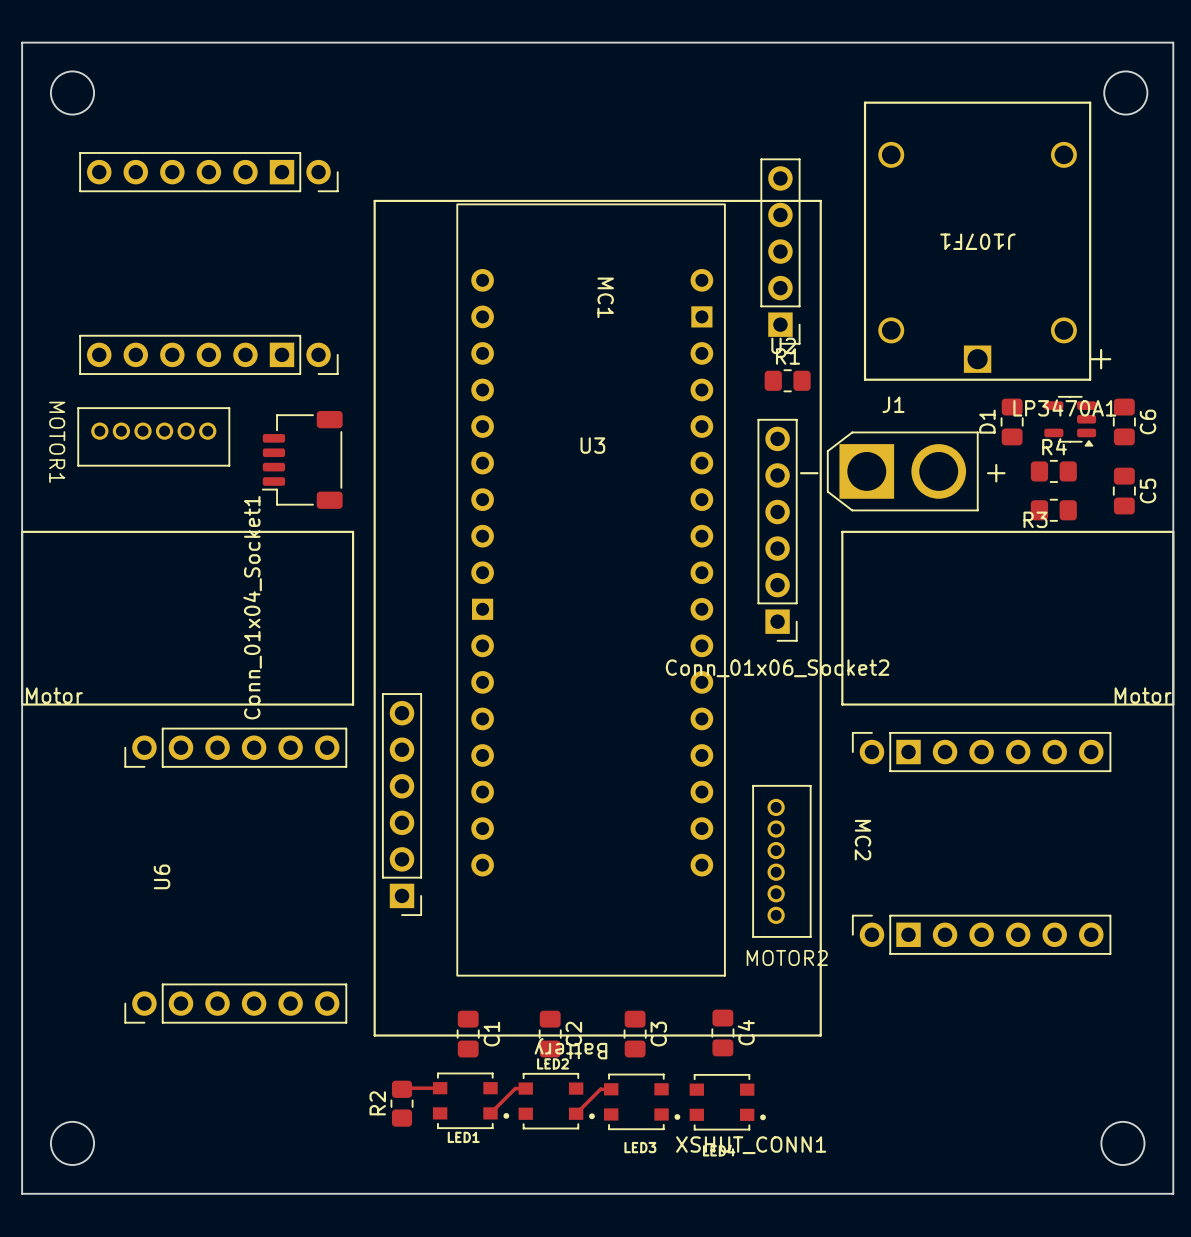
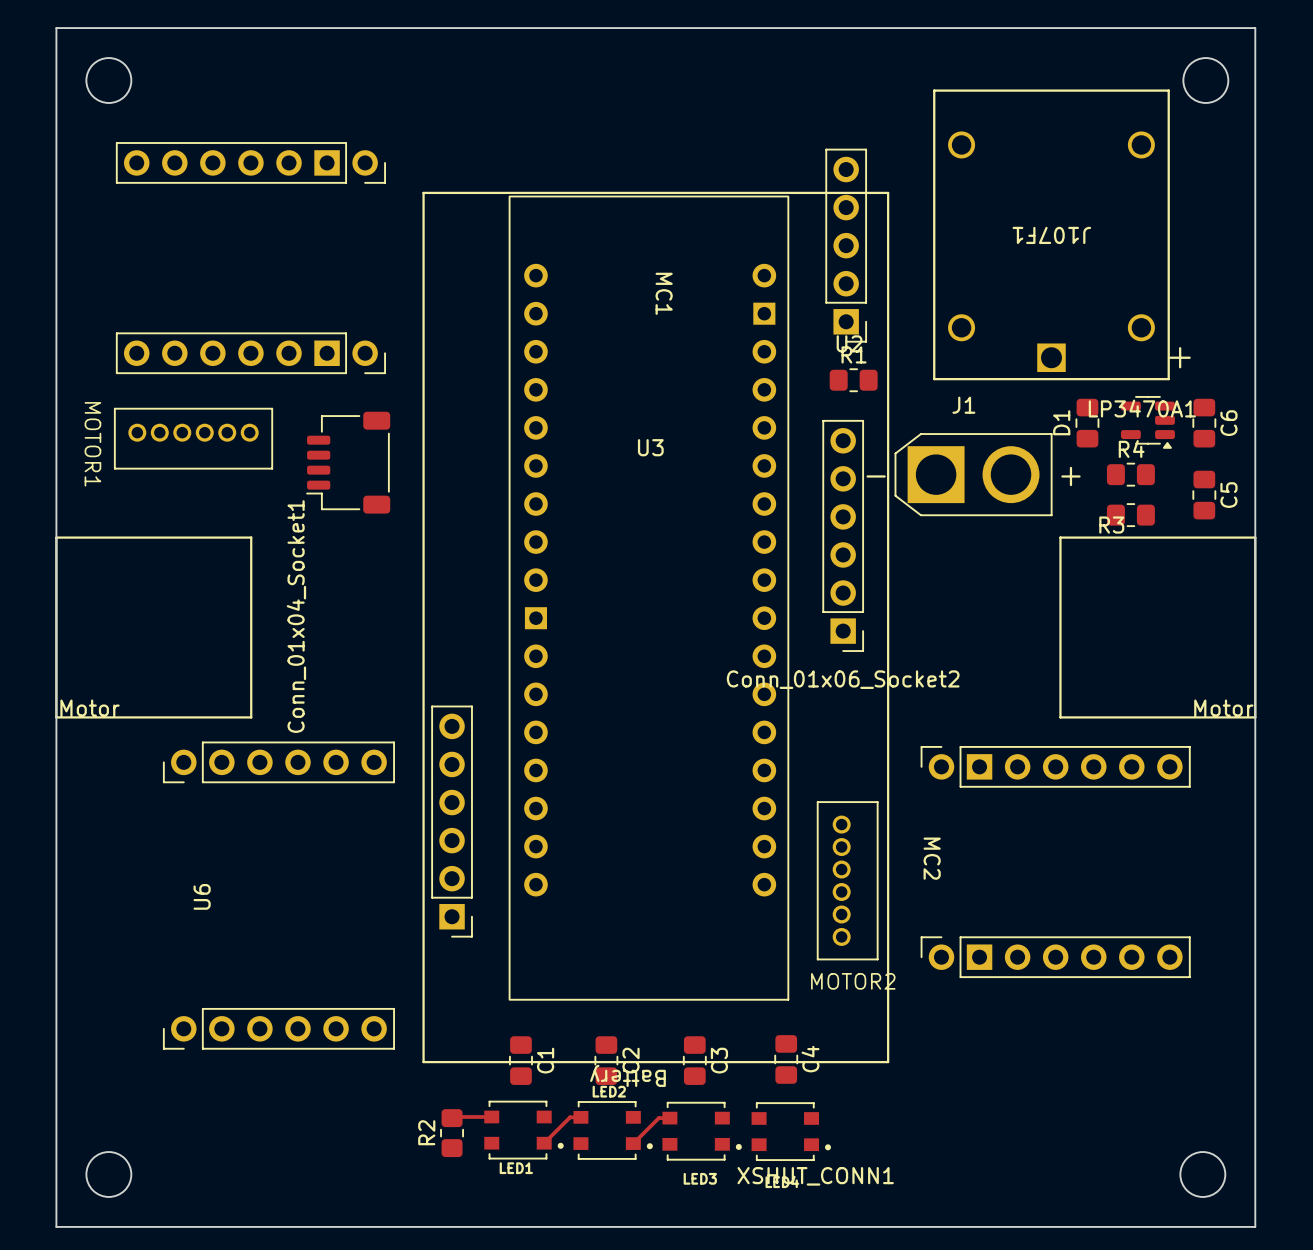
line: (209, 531) (353, 531) (353, 704) (209, 704) -> (251, 537) (251, 717)
line: (986, 531) (842, 531) (842, 704) (986, 704) -> (1060, 537) (1060, 717)

